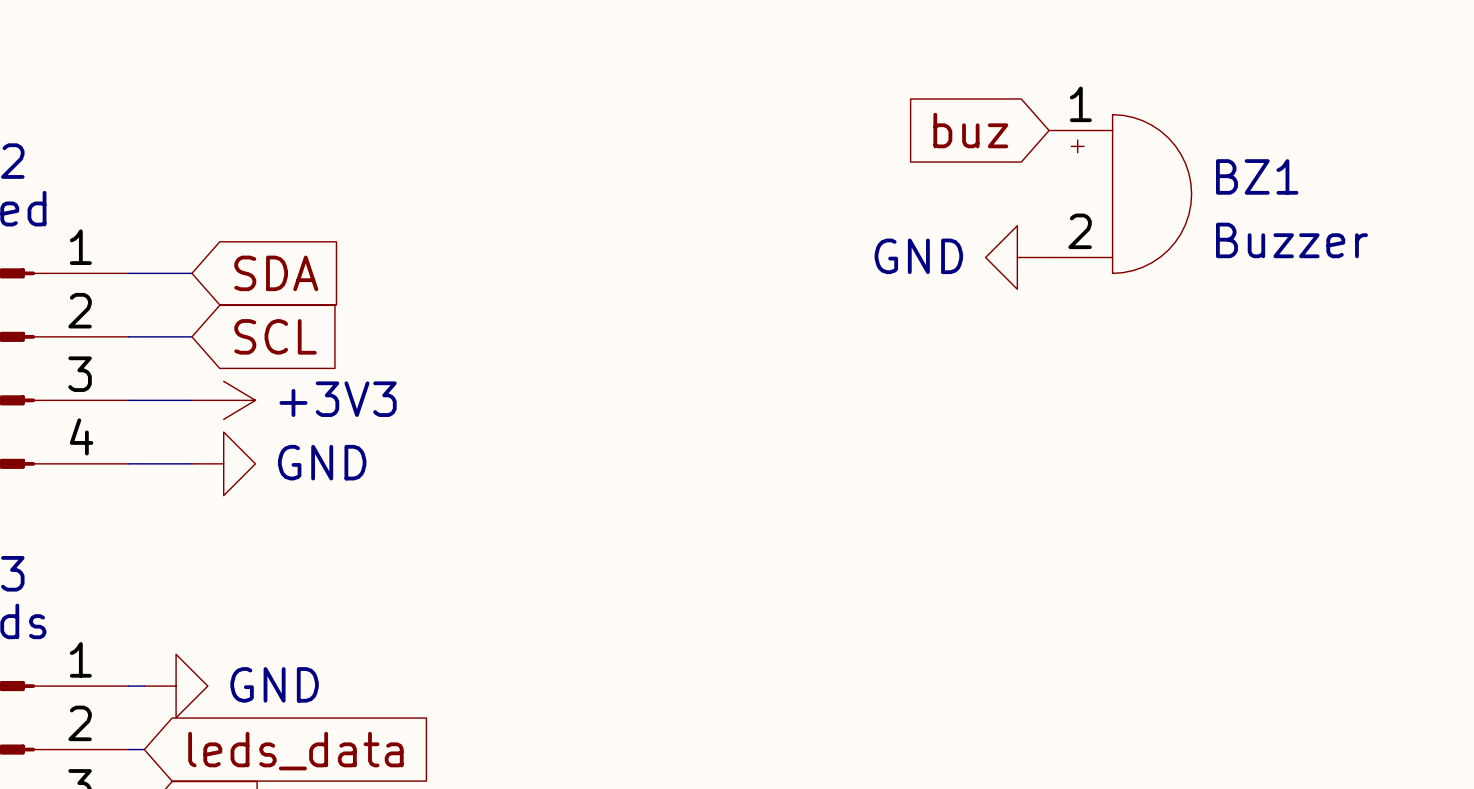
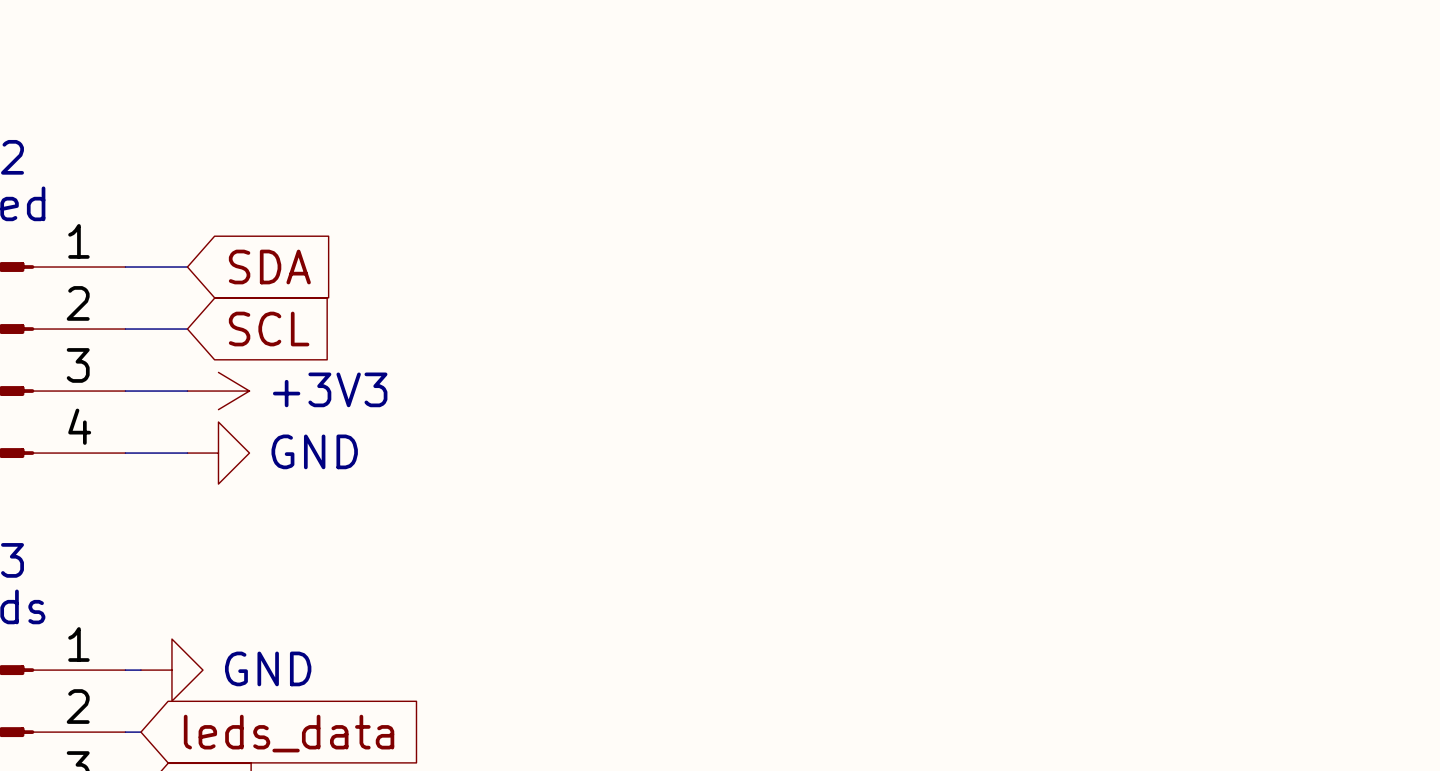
global label: buz (970, 130) -> none
BZ1: Buzzer (1120, 194) -> none
power symbol: GND (1017, 257) -> none

